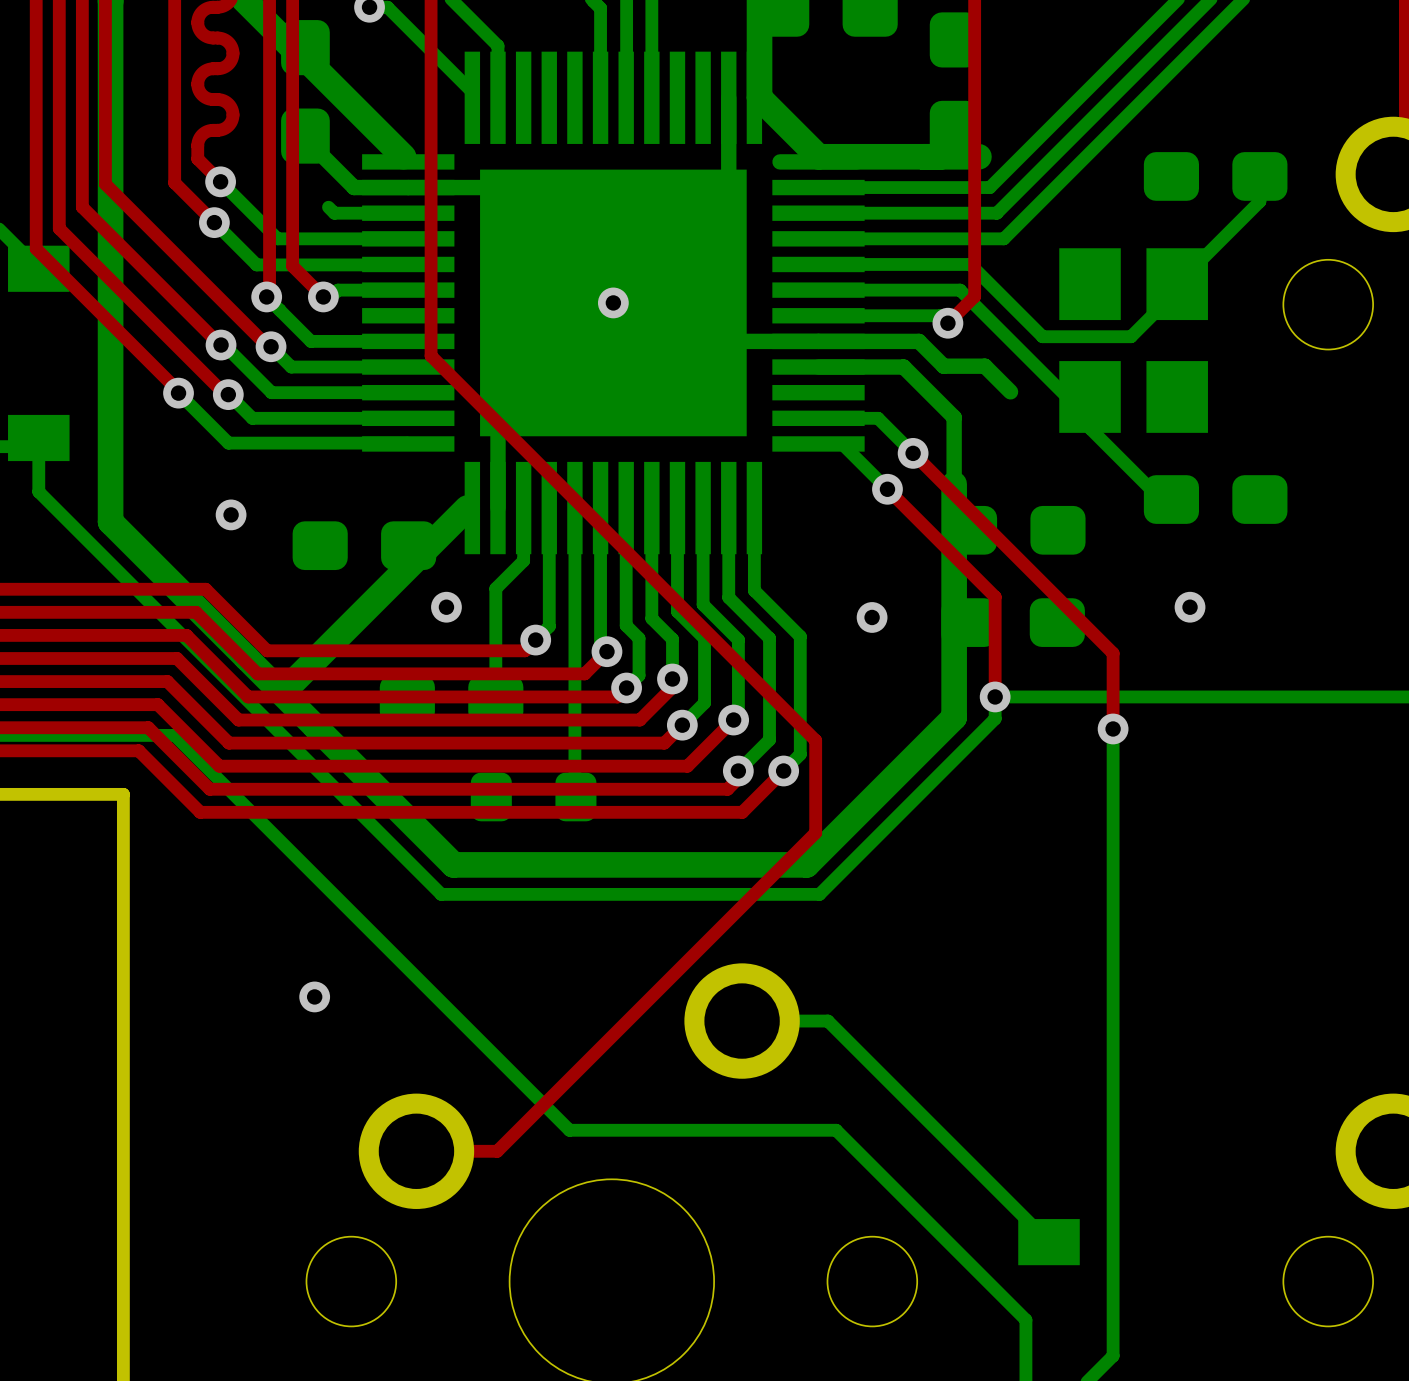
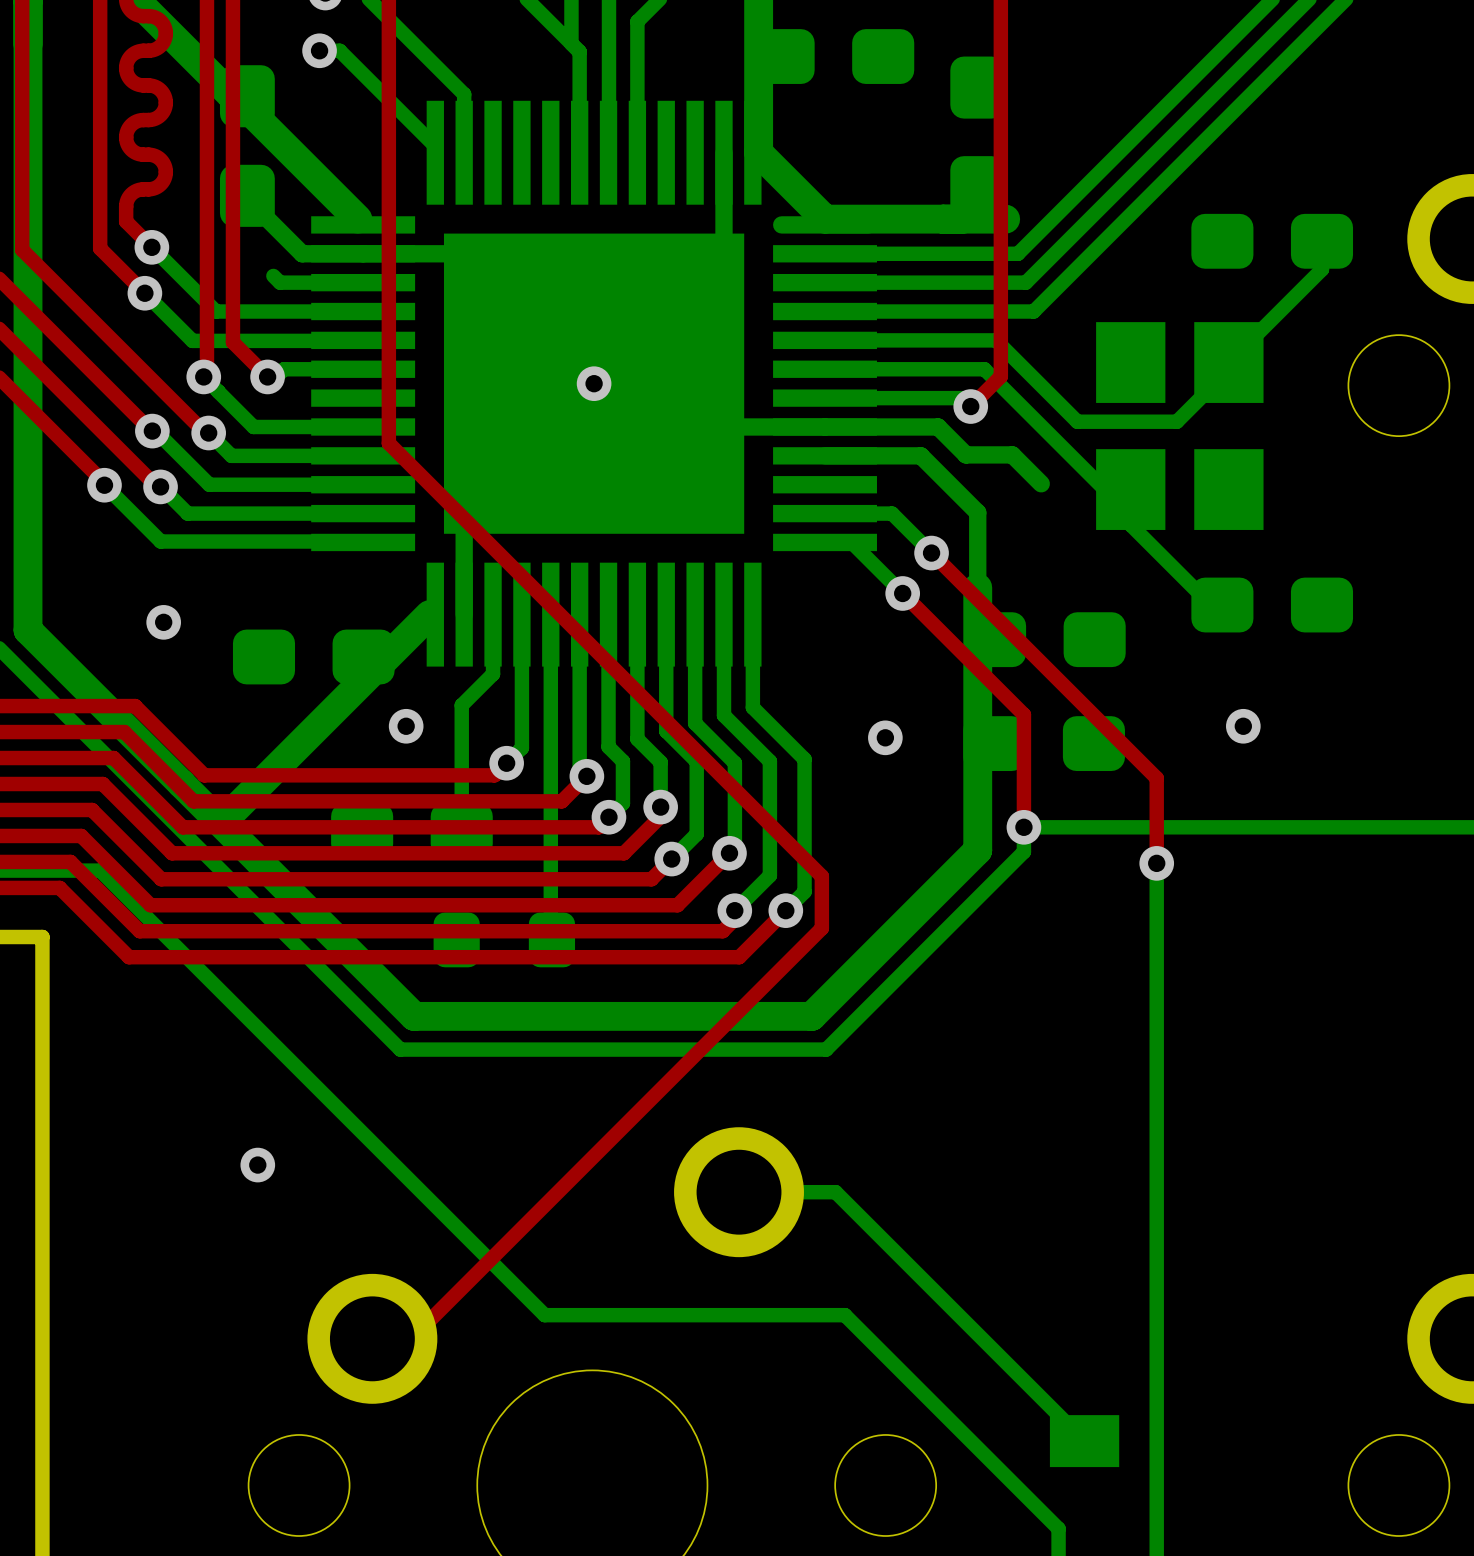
top track: (815, 786) (815, 832) (497, 1151) (451, 1151) -> (821, 928) (411, 1338)

